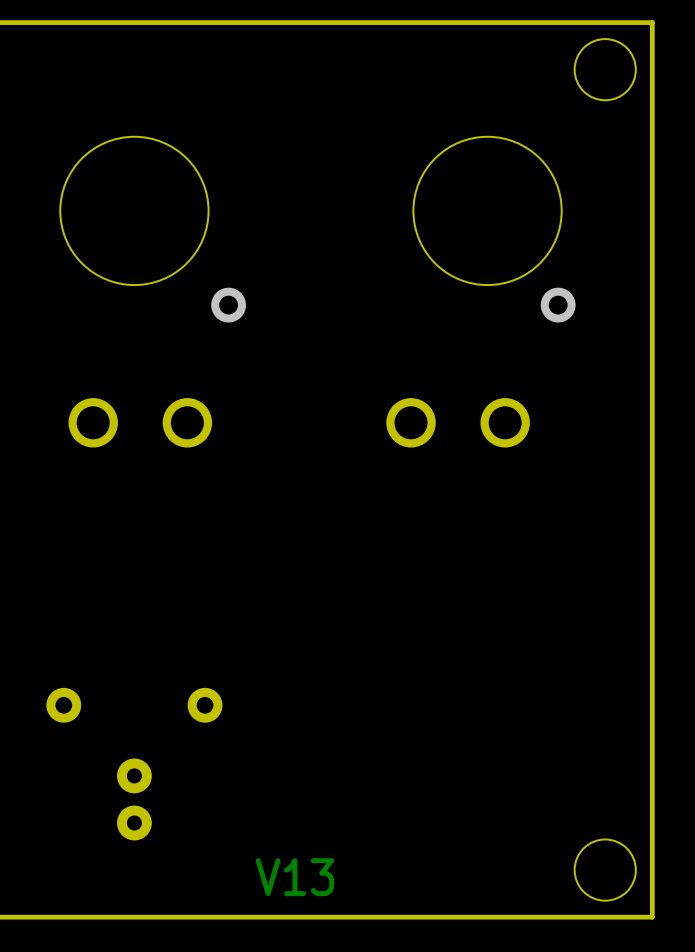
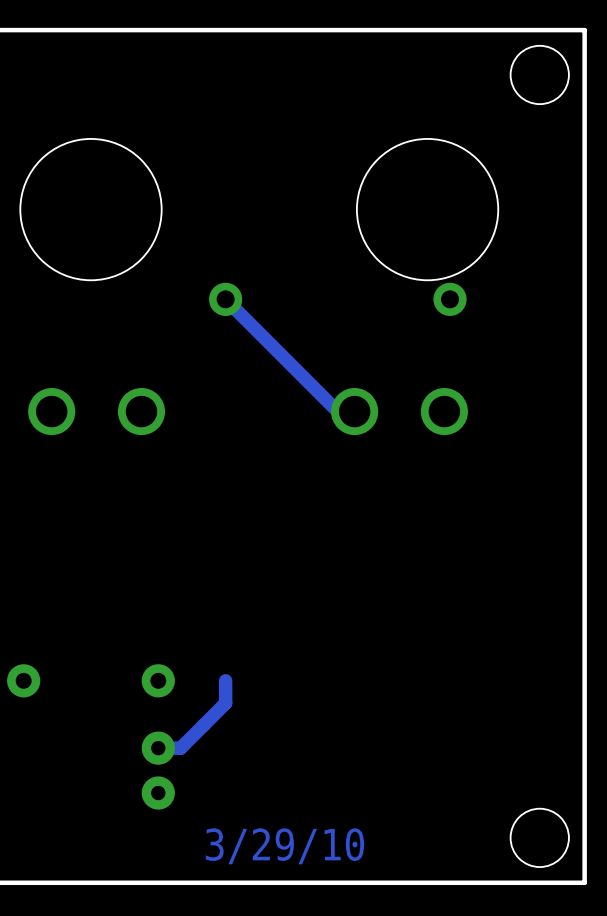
via position: (228, 305) -> (225, 299)
track: none -> (225, 299) (337, 411)
via position: (558, 305) -> (450, 299)
track: none -> (225, 680) (225, 703) (180, 748) (158, 748)
part position: (134, 799) -> (158, 770)
text: V13 (294, 877) -> 3/29/10 (284, 846)

